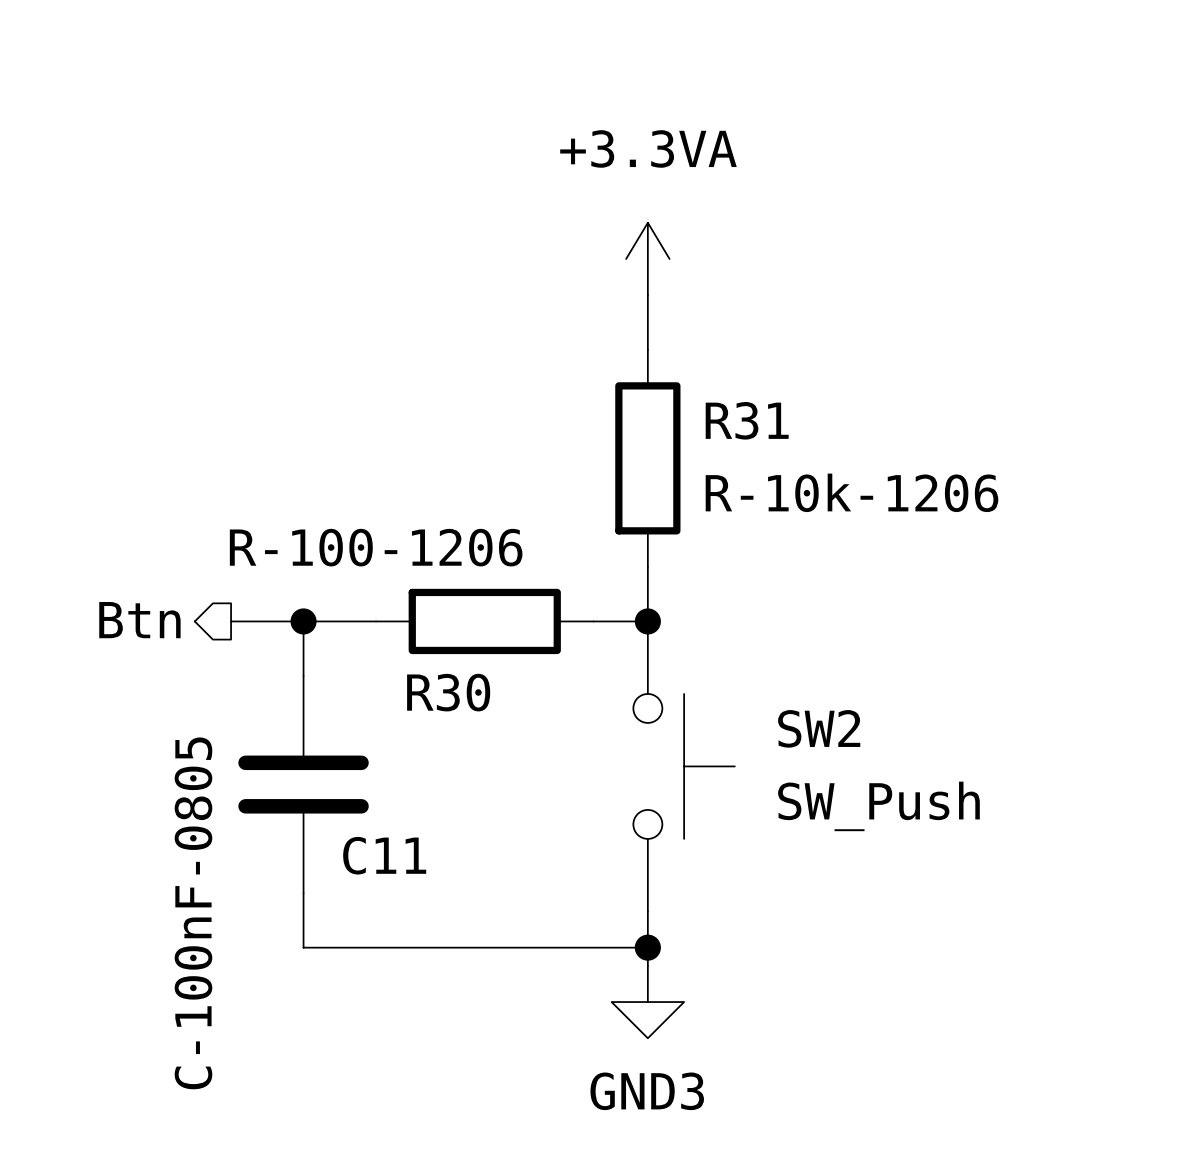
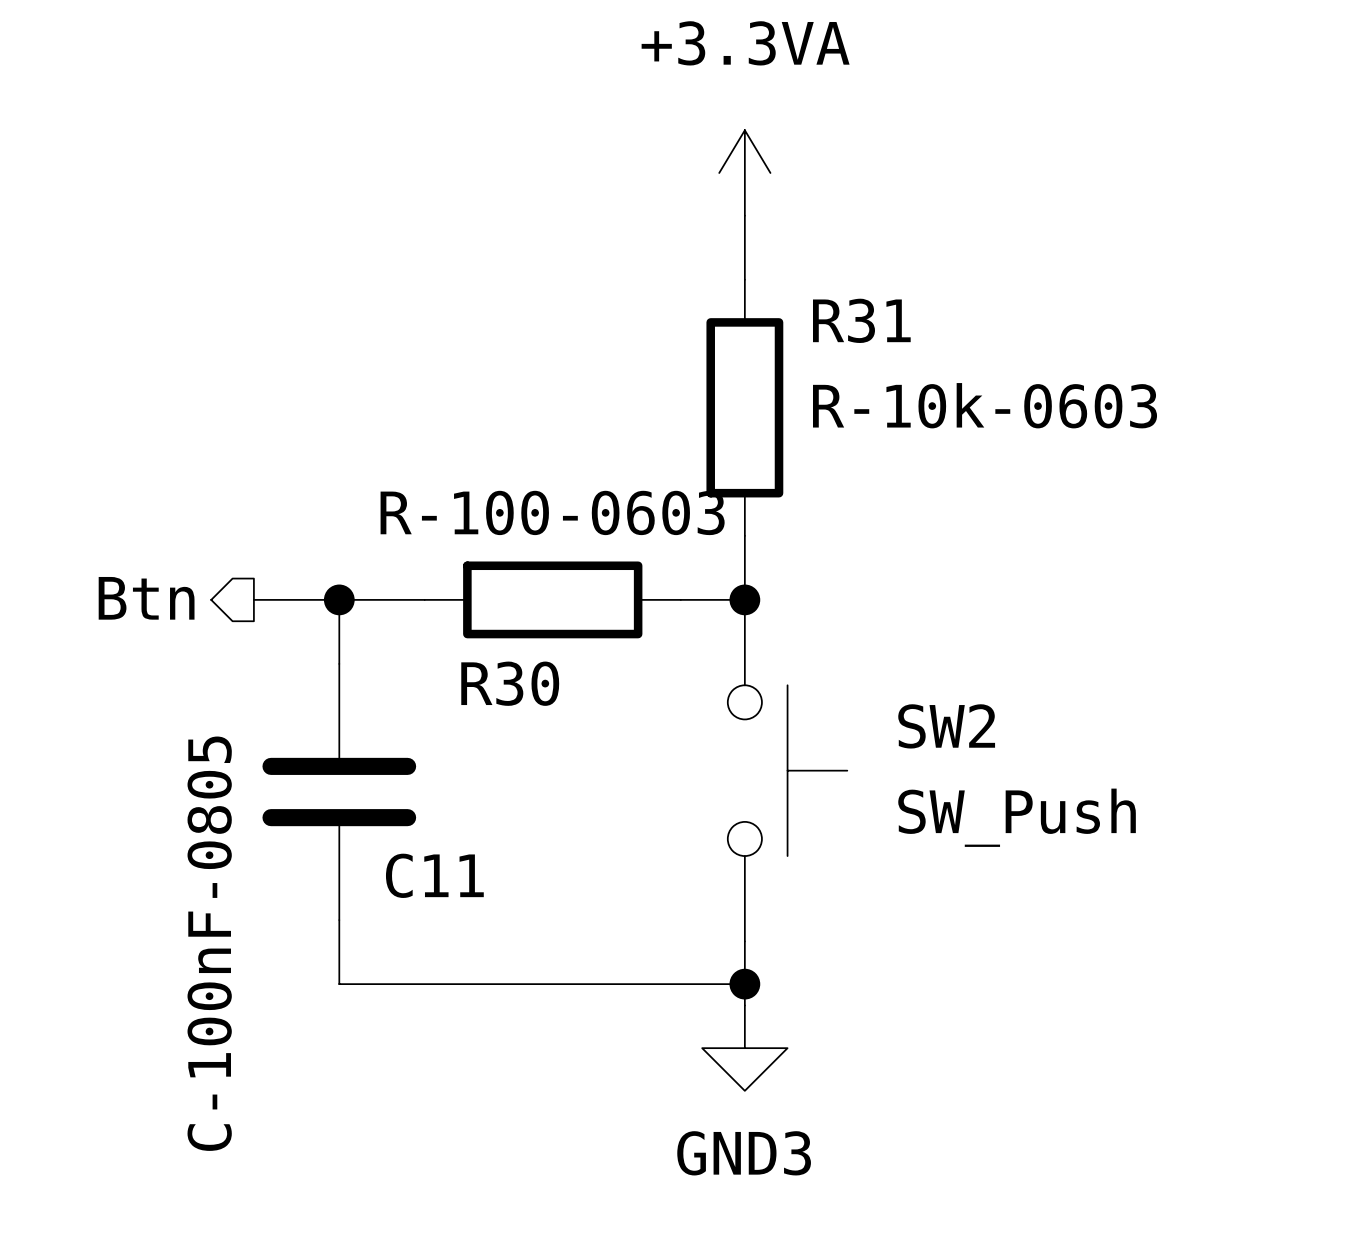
R31 name position: R31 (747, 420) -> R31 (861, 320)
R31 value: R-10k-1206 (852, 492) -> R-10k-0603 (985, 405)
R30 value: R-100-1206 (376, 547) -> R-100-0603 (552, 512)

